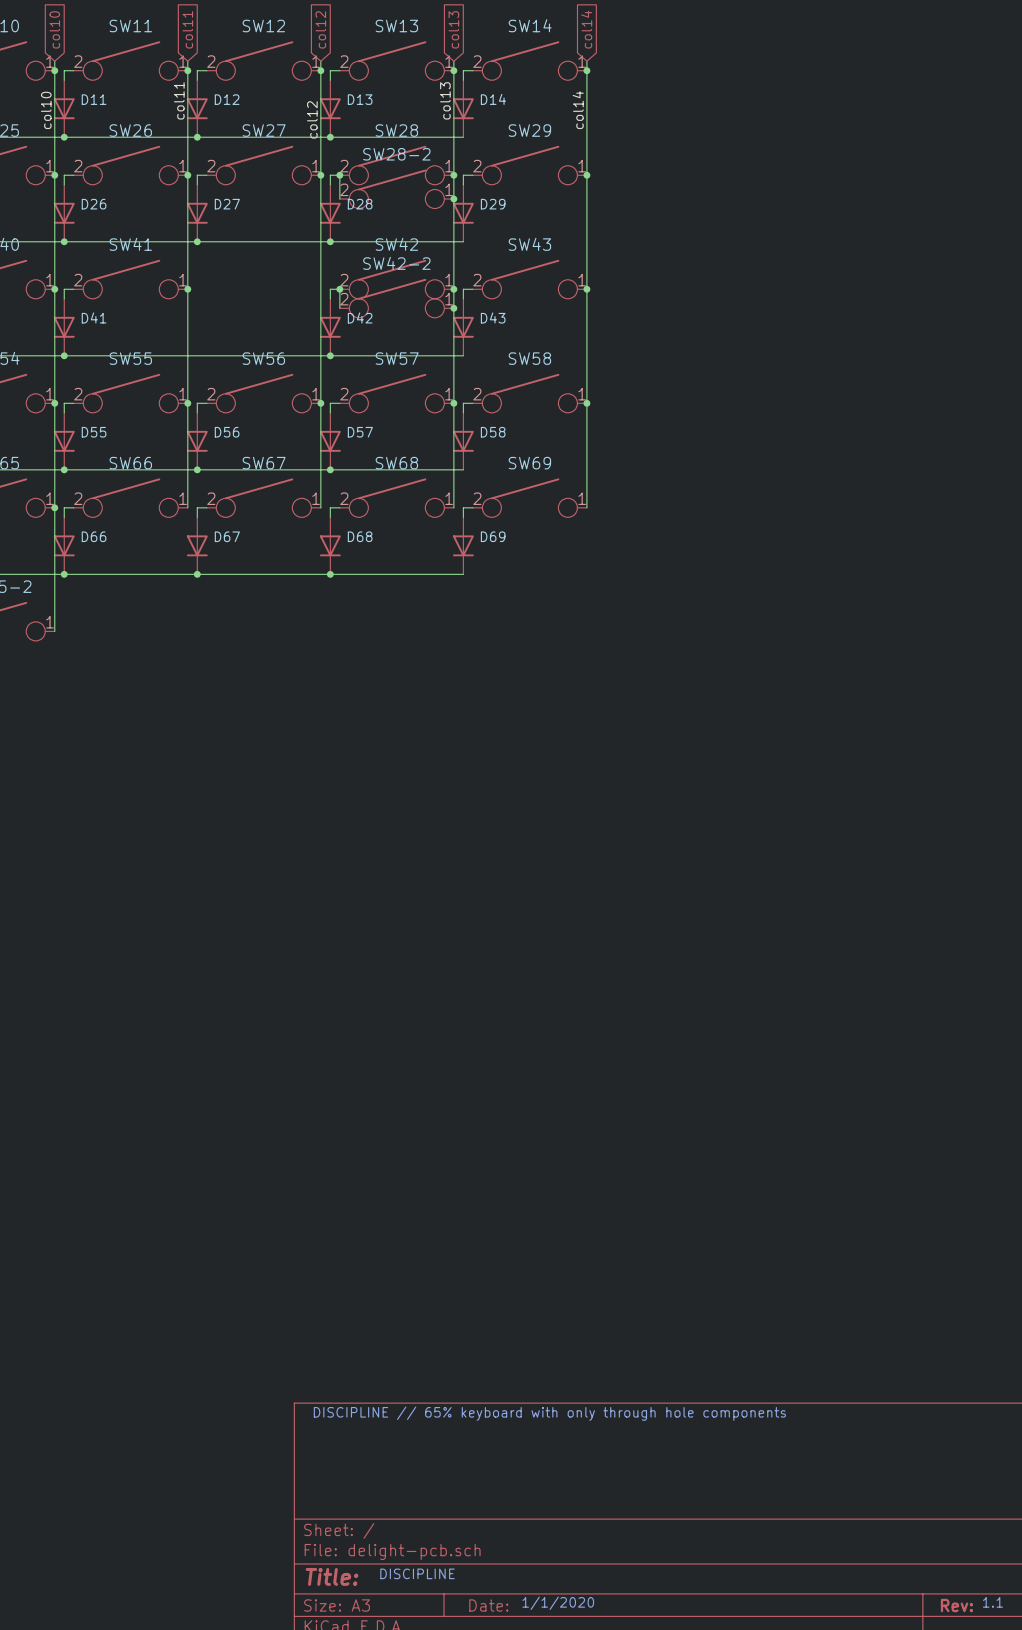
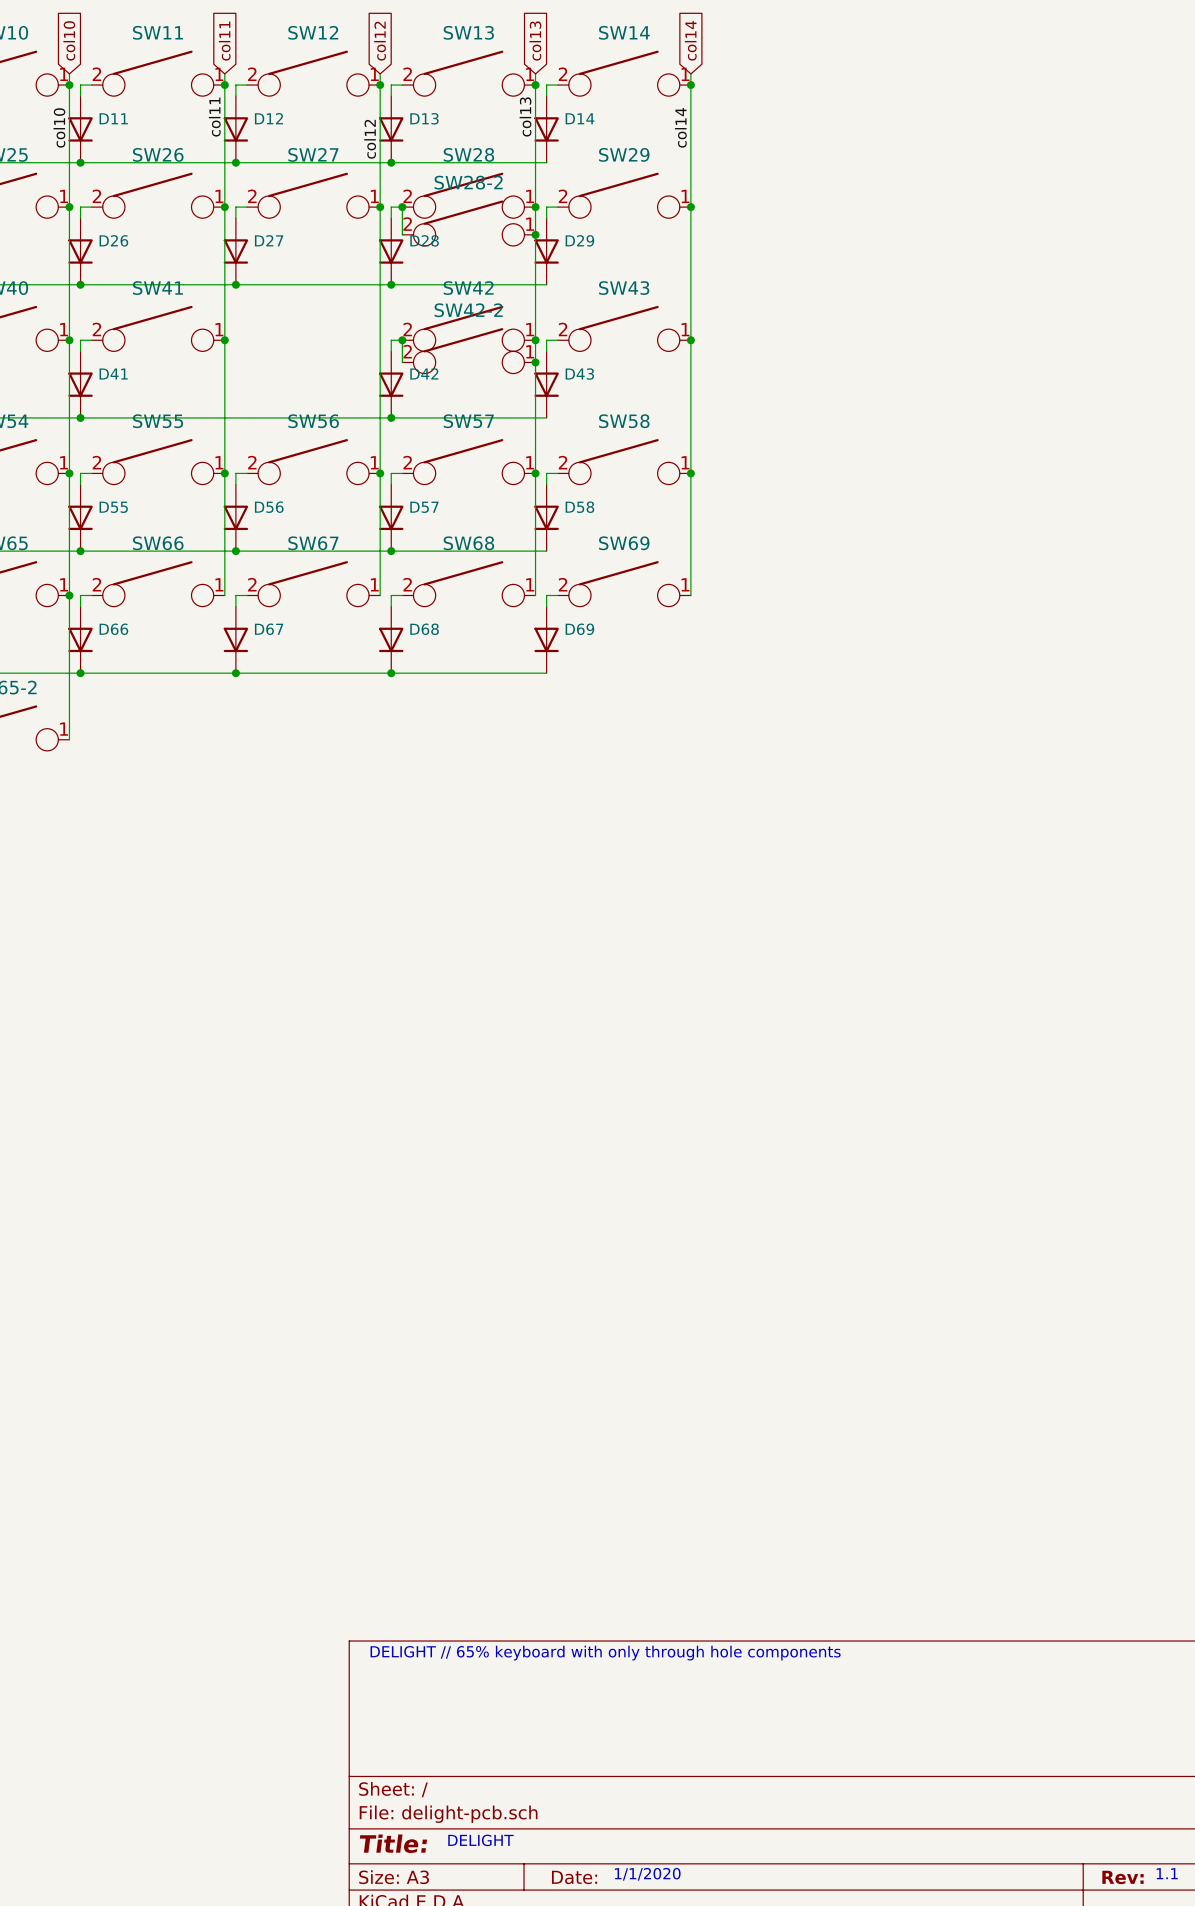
text: DISCIPLINE // 65% keyboard with only through hole components (549, 1413) -> DELIGHT // 65% keyboard with only through hole components (605, 1653)
text: DISCIPLINE (417, 1573) -> DELIGHT (480, 1840)

